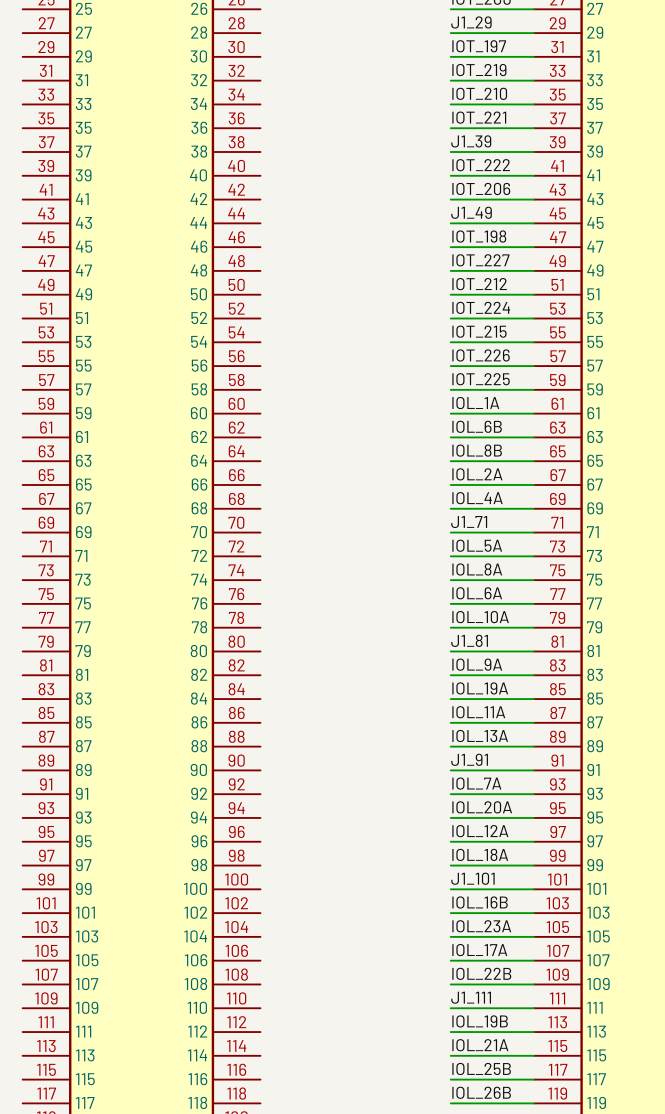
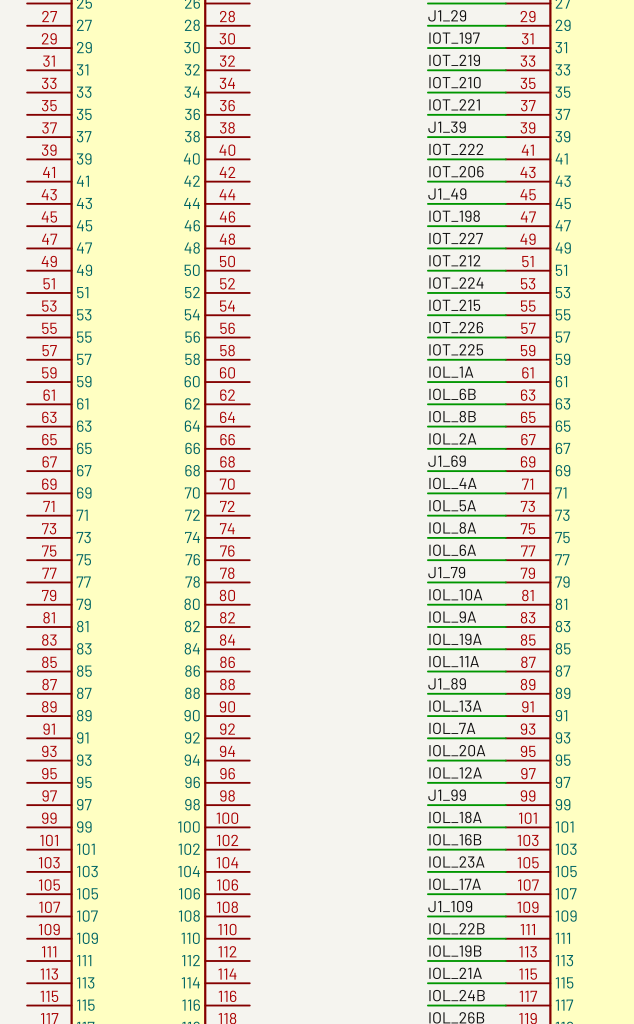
label: IOL_4A (477, 498) -> J1_69 (447, 461)
label: J1_71 (469, 522) -> IOL_4A (452, 483)
label: IOL_10A (480, 617) -> J1_79 (446, 572)
label: J1_81 (469, 640) -> IOL_10A (455, 594)
label: IOL_13A (480, 736) -> J1_89 (447, 683)
label: J1_91 (469, 759) -> IOL_13A (455, 706)
label: IOL_18A (480, 854) -> J1_99 (447, 795)
label: J1_101 (472, 878) -> IOL_18A (455, 817)
label: IOL_22B (481, 973) -> J1_109 (450, 906)
label: J1_111 (471, 997) -> IOL_22B (456, 928)
label: IOL_25B (481, 1068) -> IOL_24B (457, 995)

